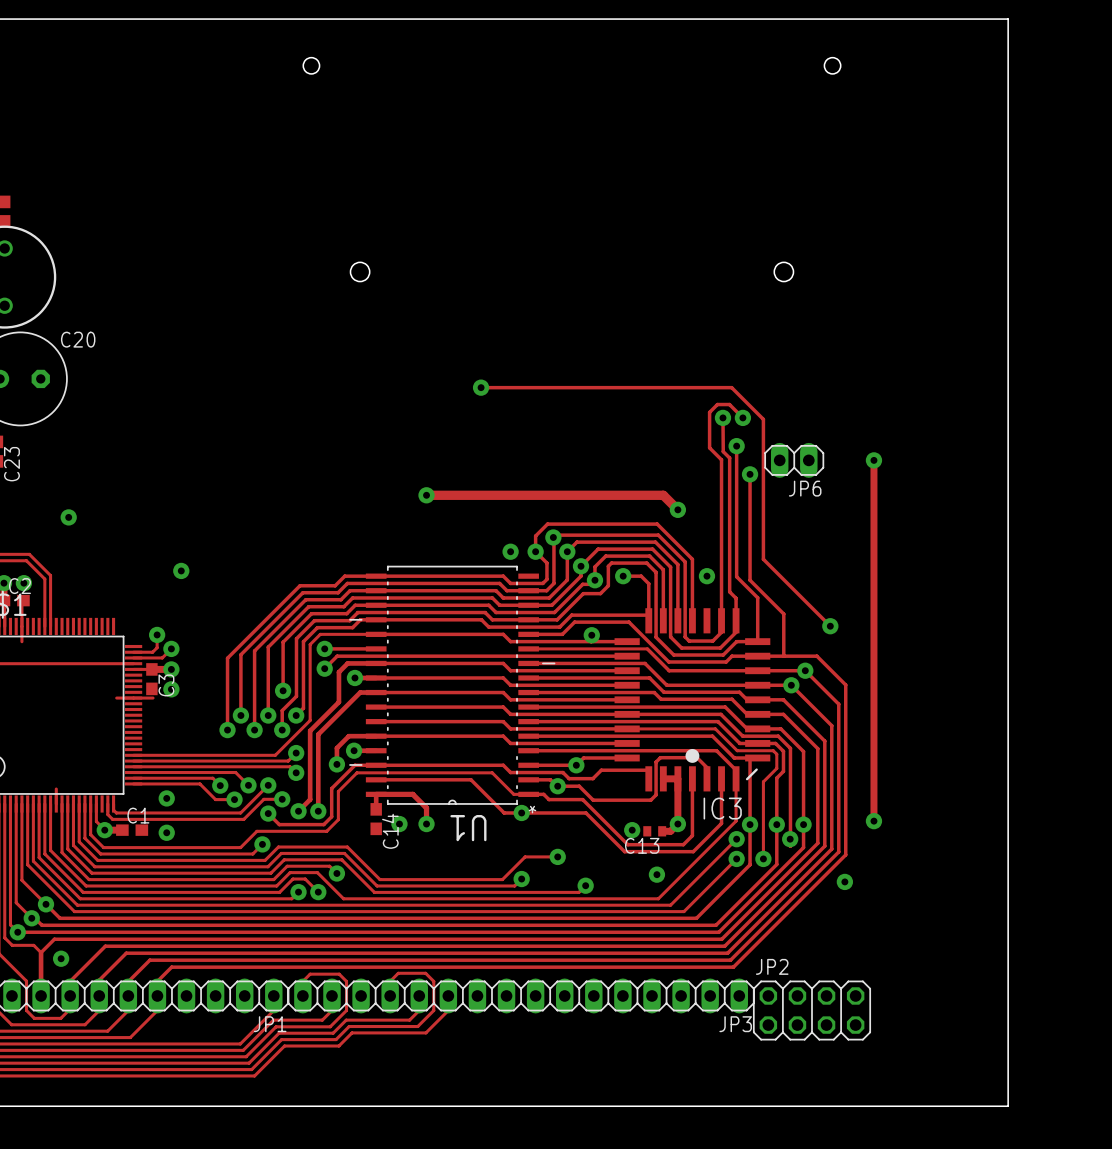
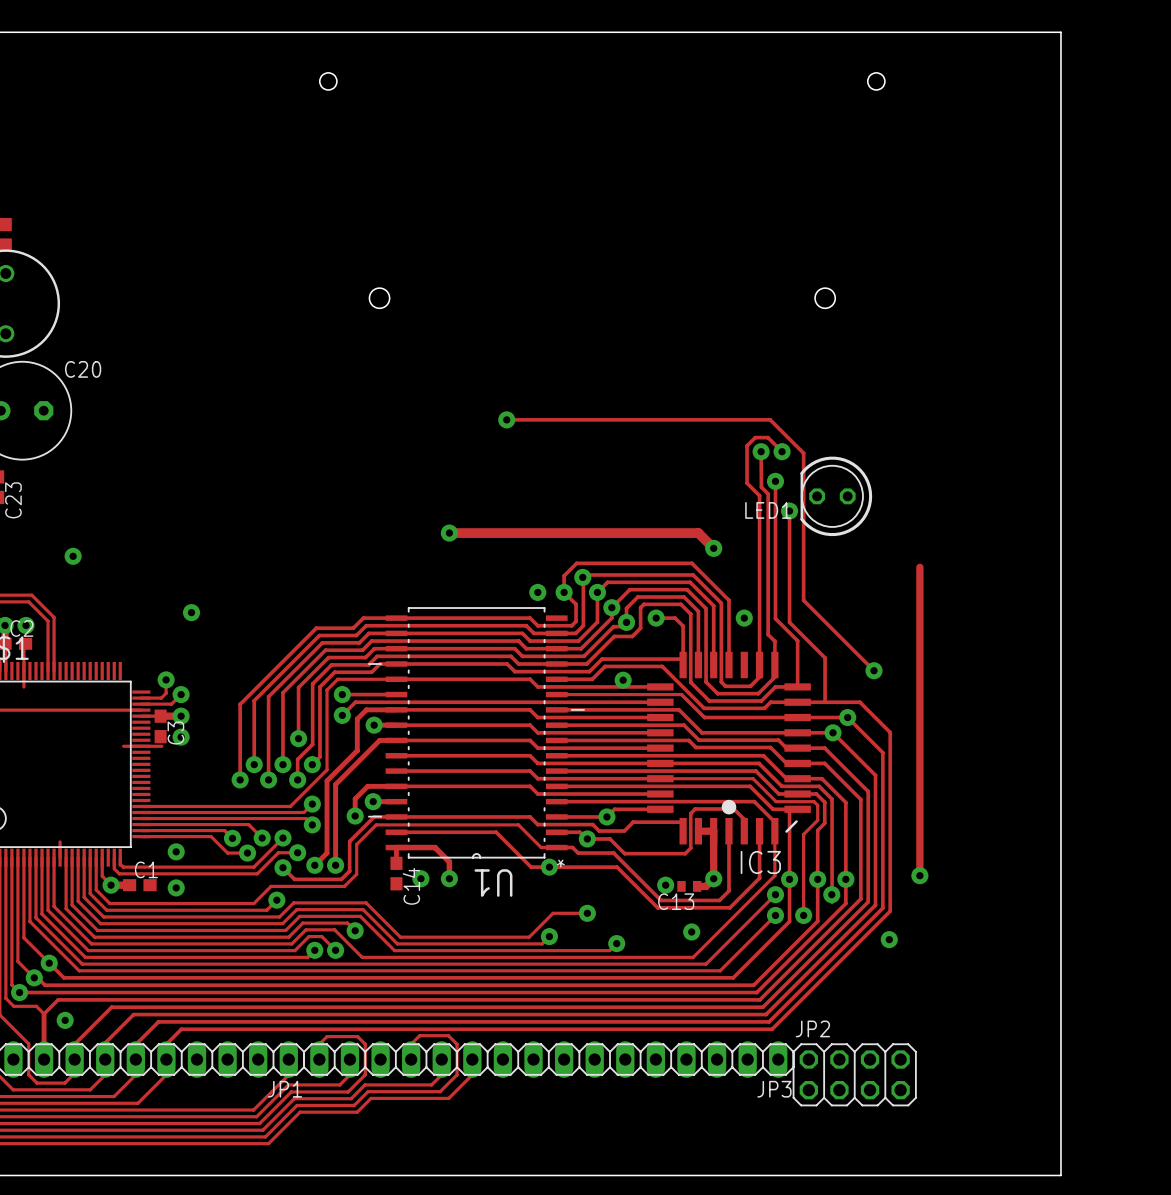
JP6: (794, 460) -> none
LED1: none -> (836, 496)
track: (873, 460) (873, 527) -> none
via: (873, 460) -> none

